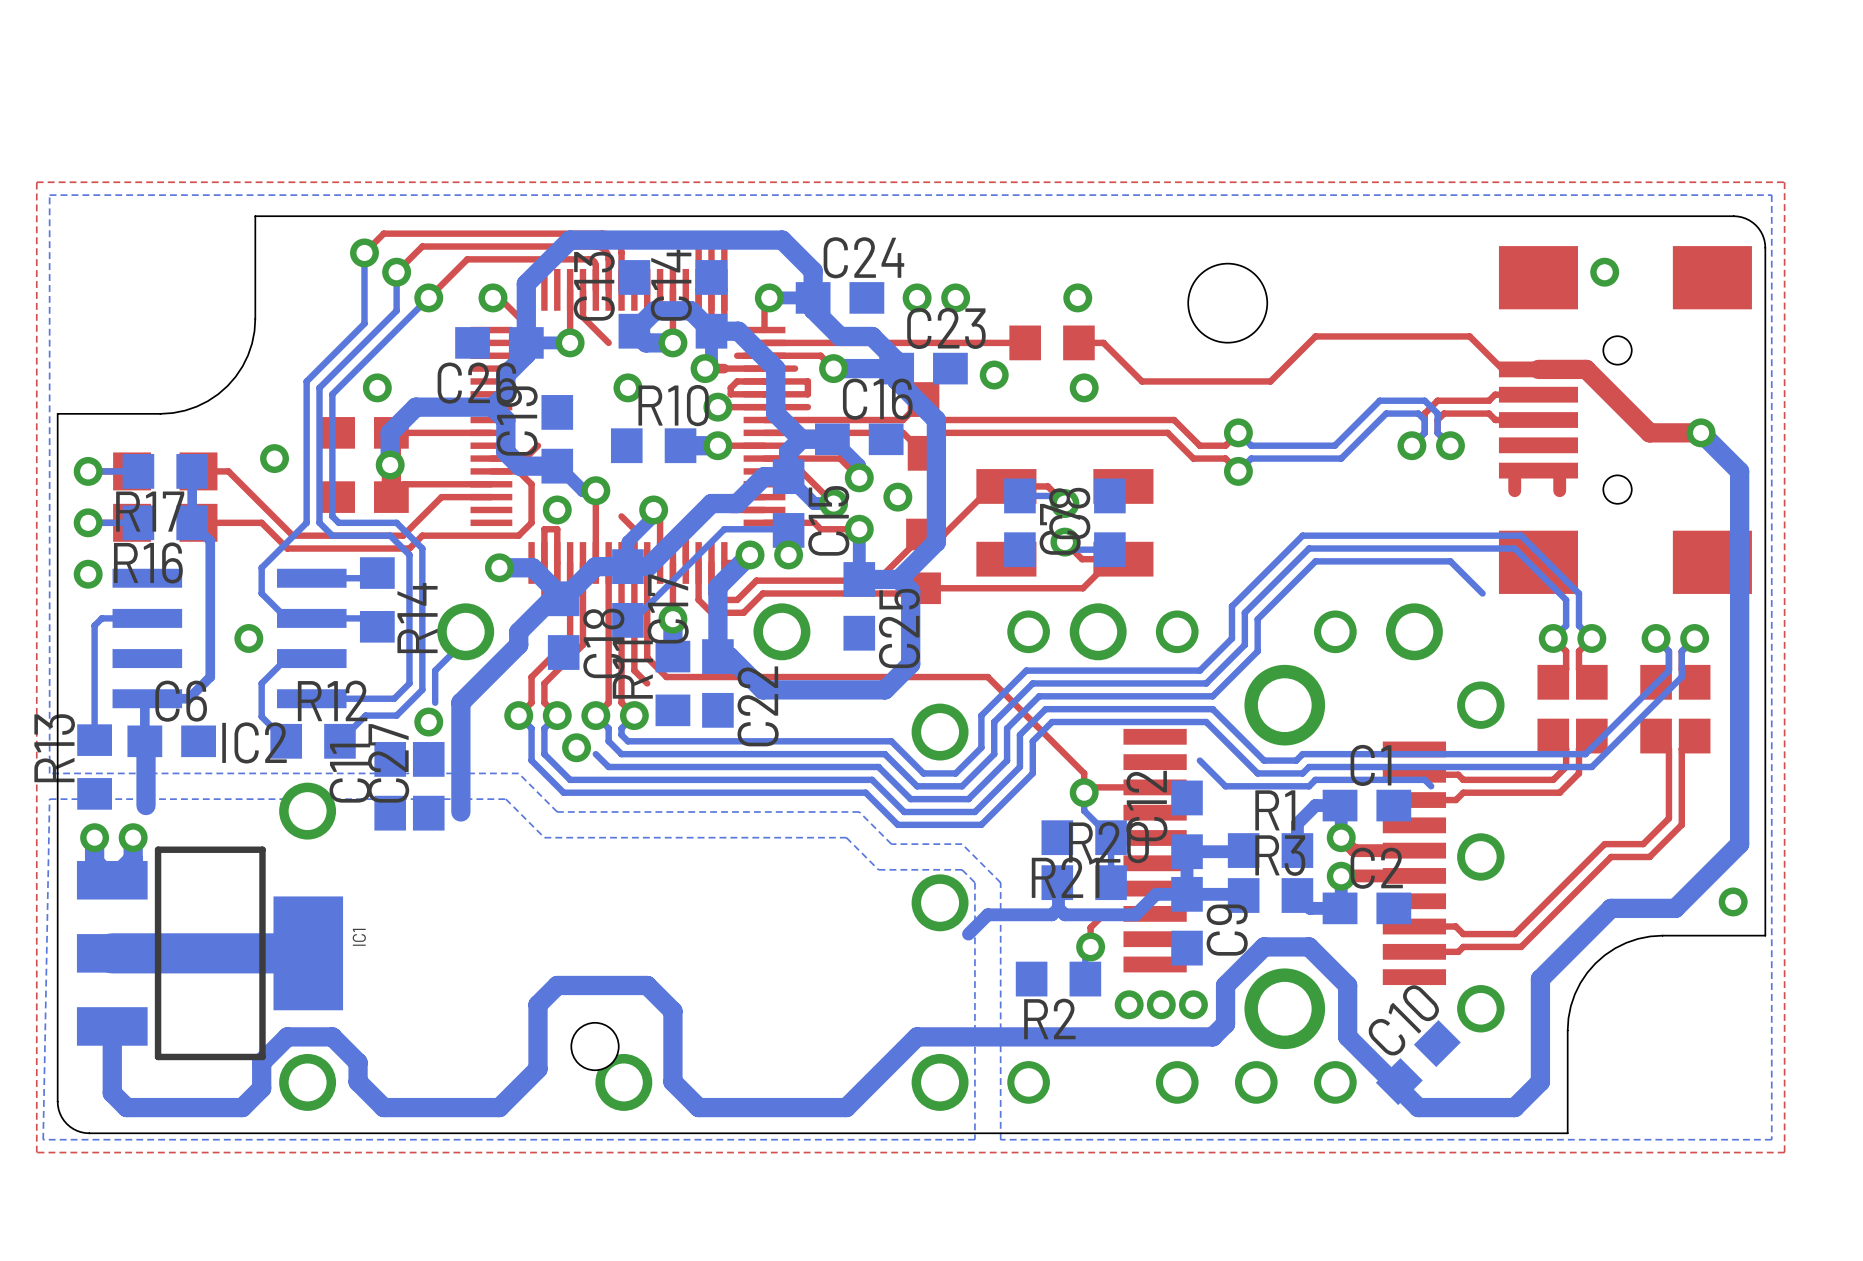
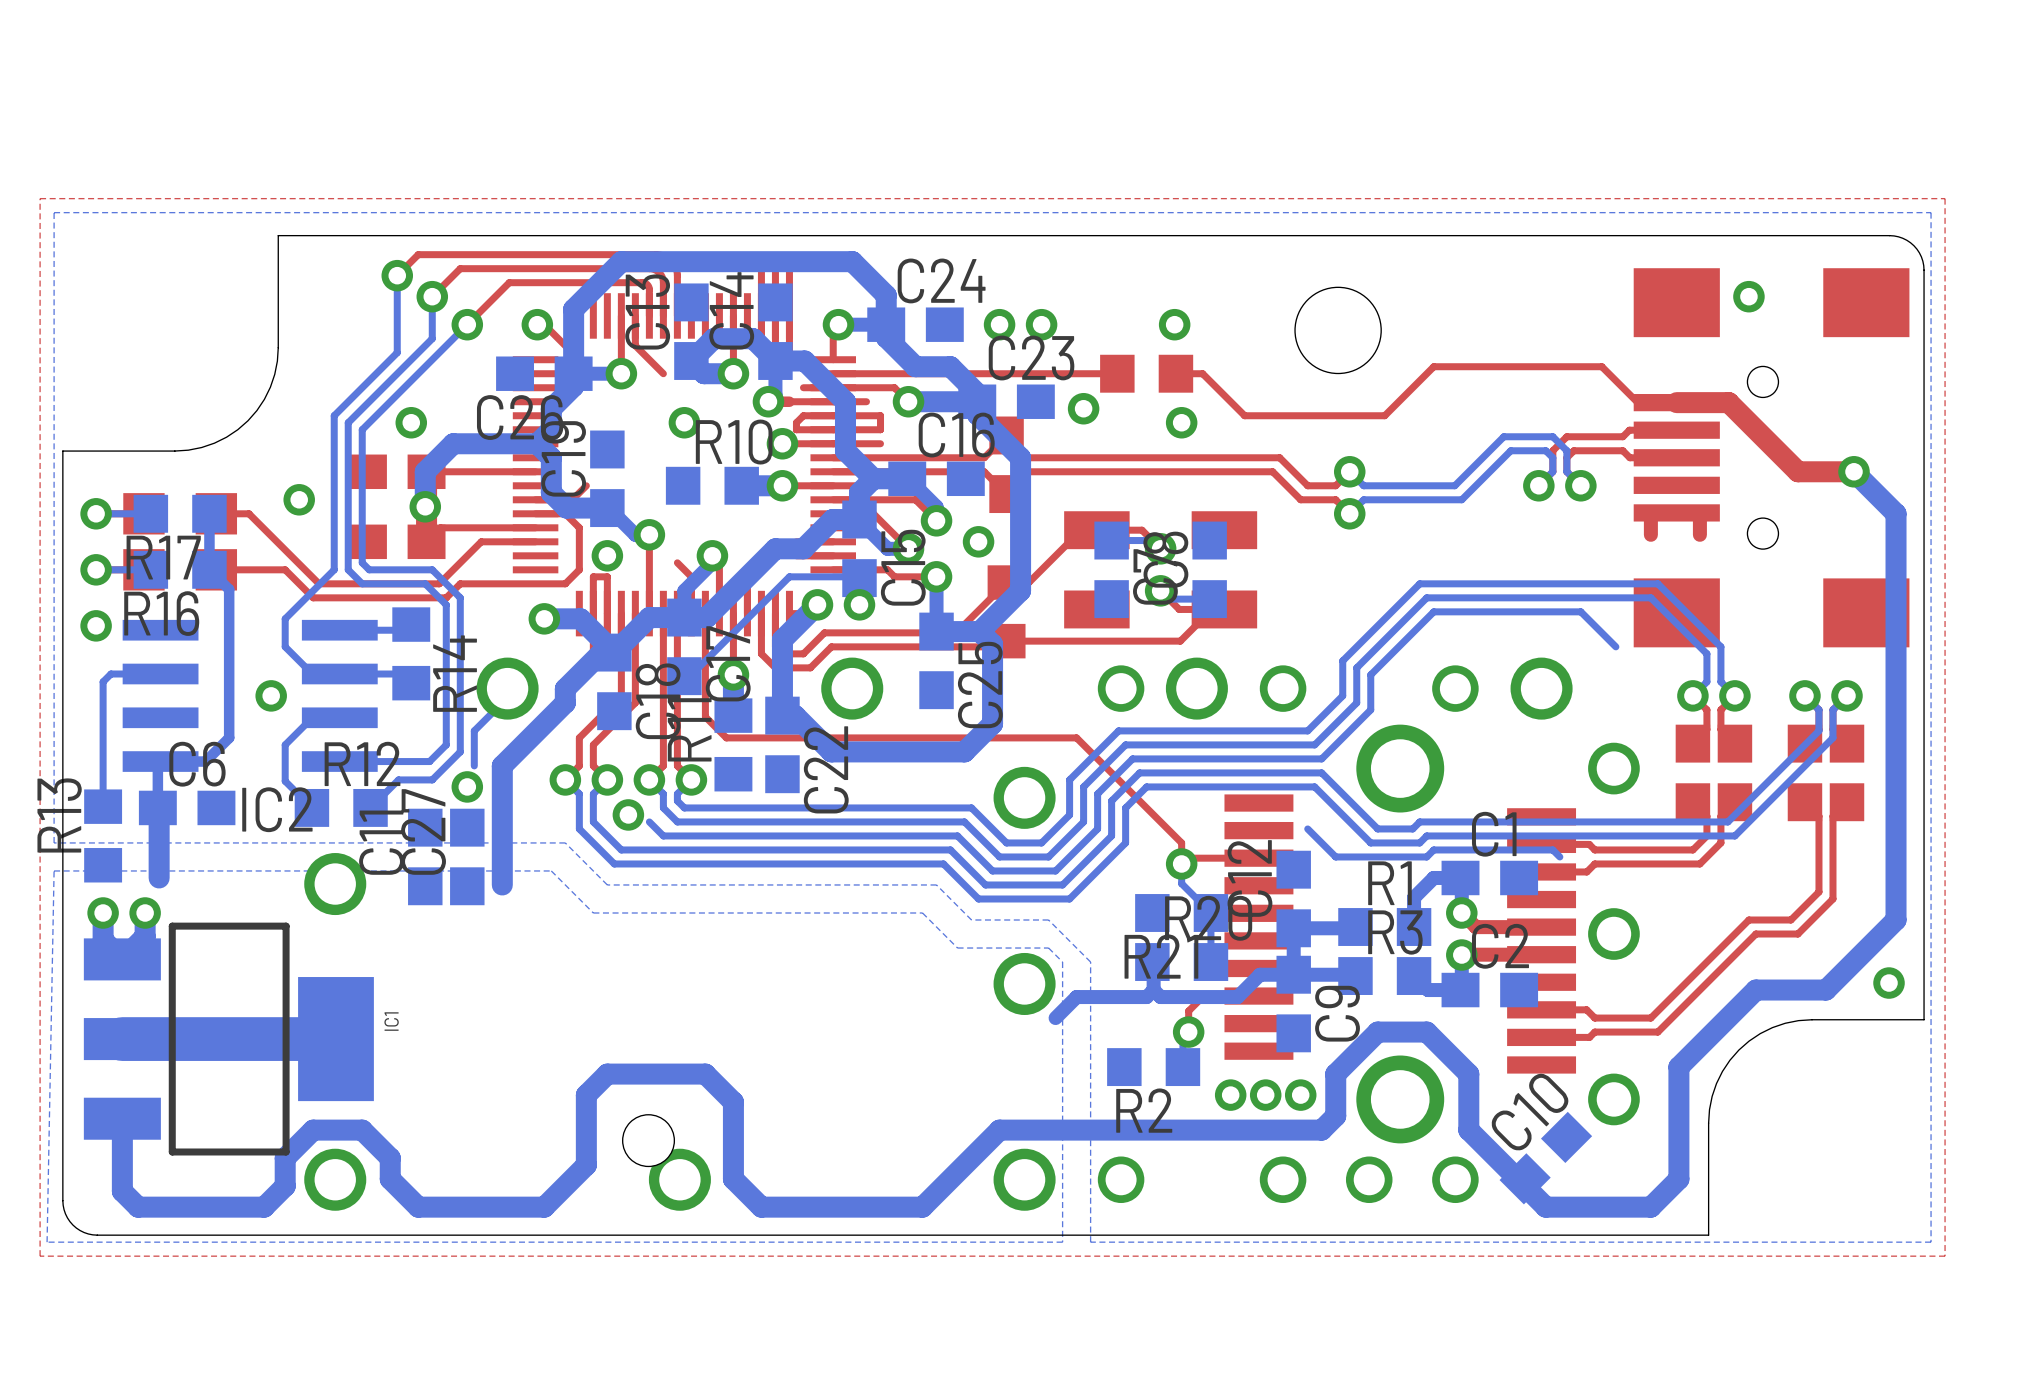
top track: (634, 562) (634, 670) (647, 683) -> none

